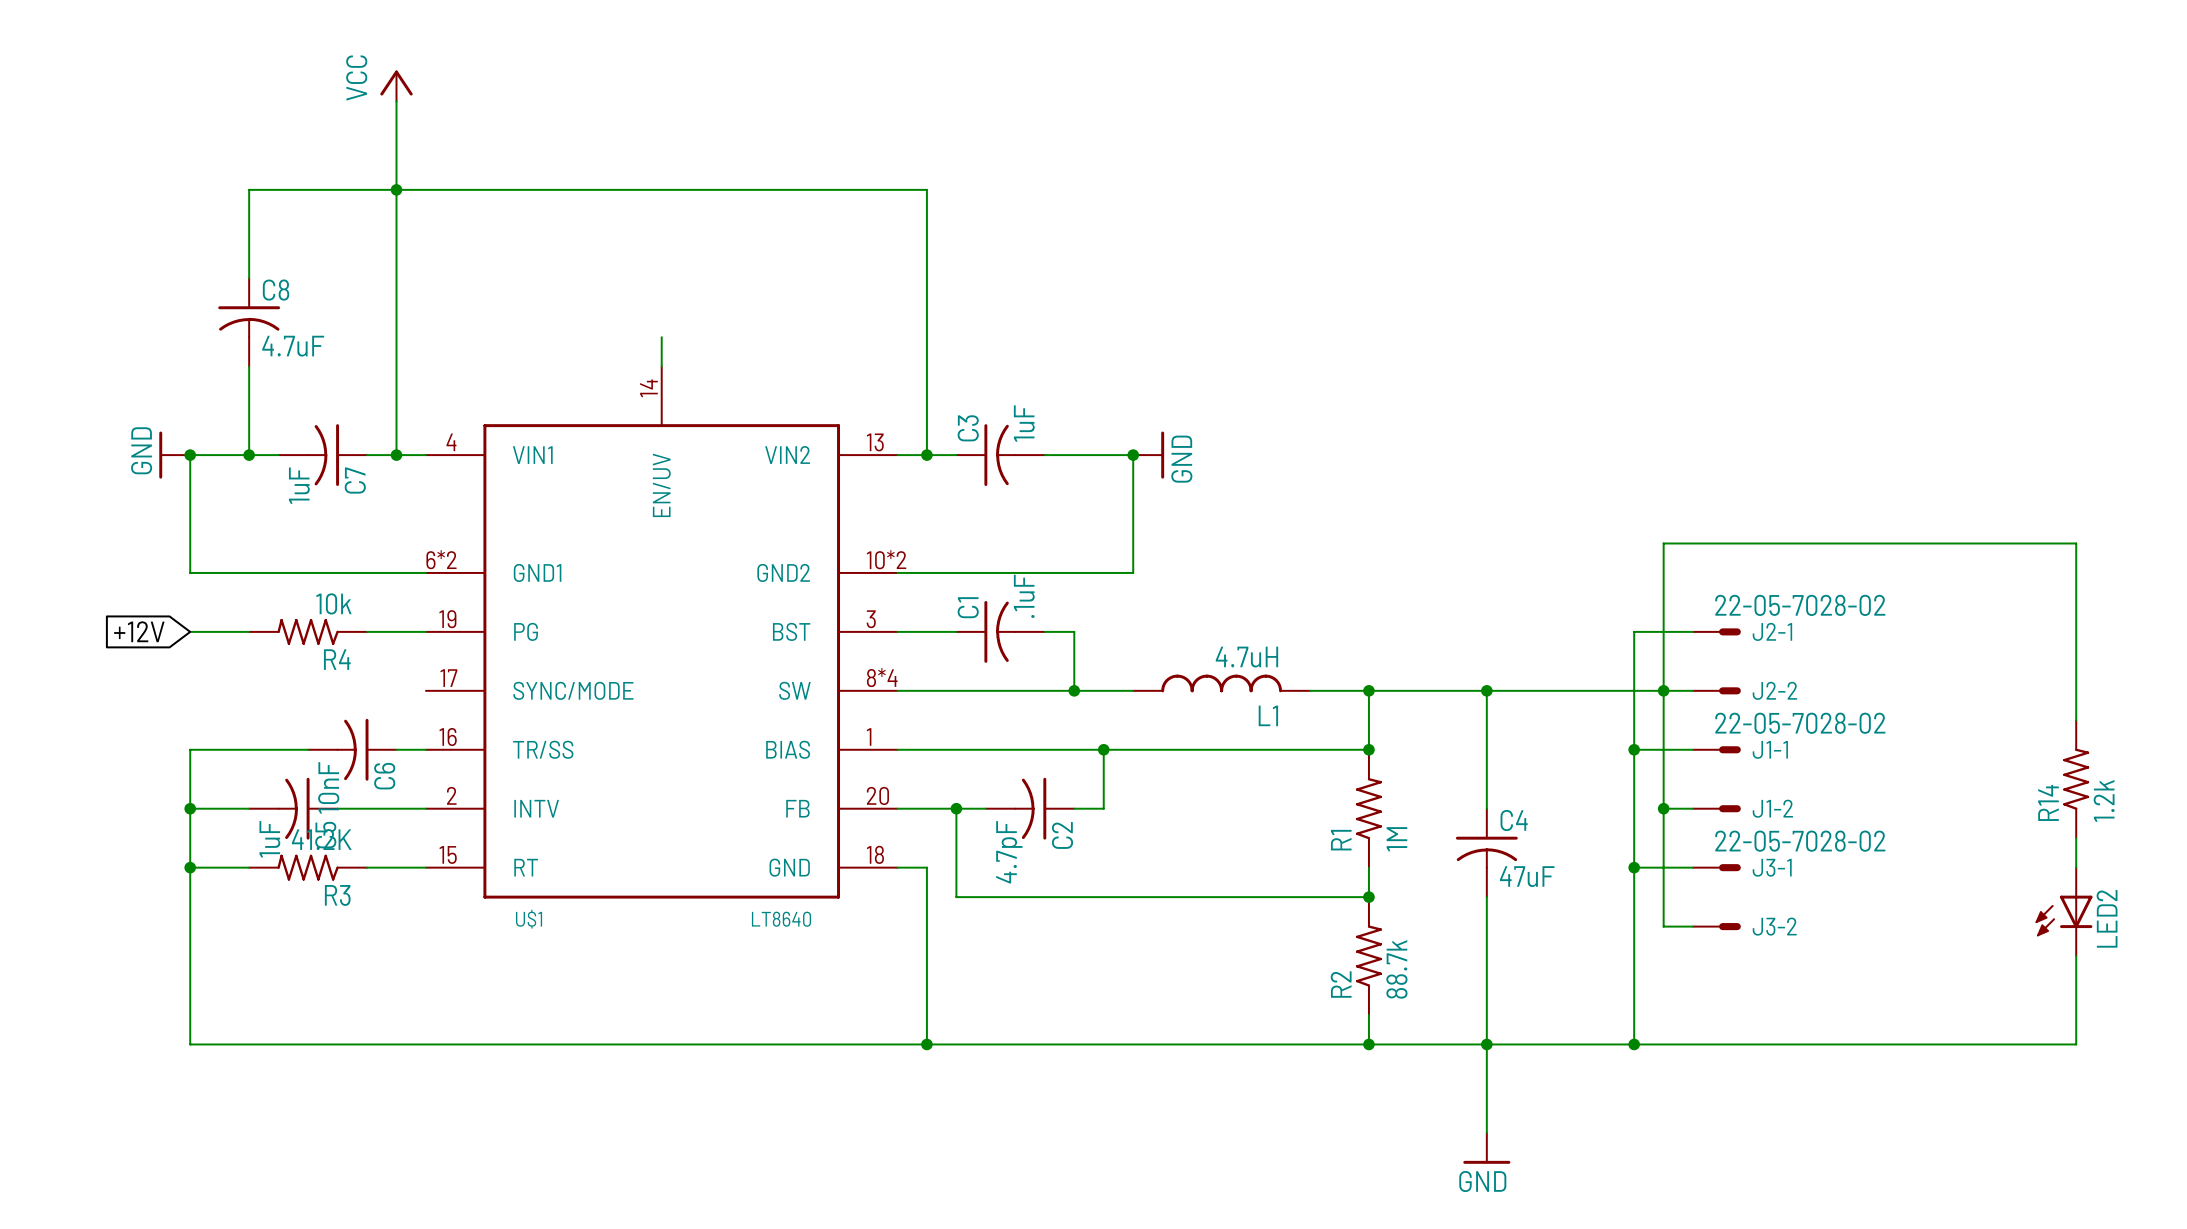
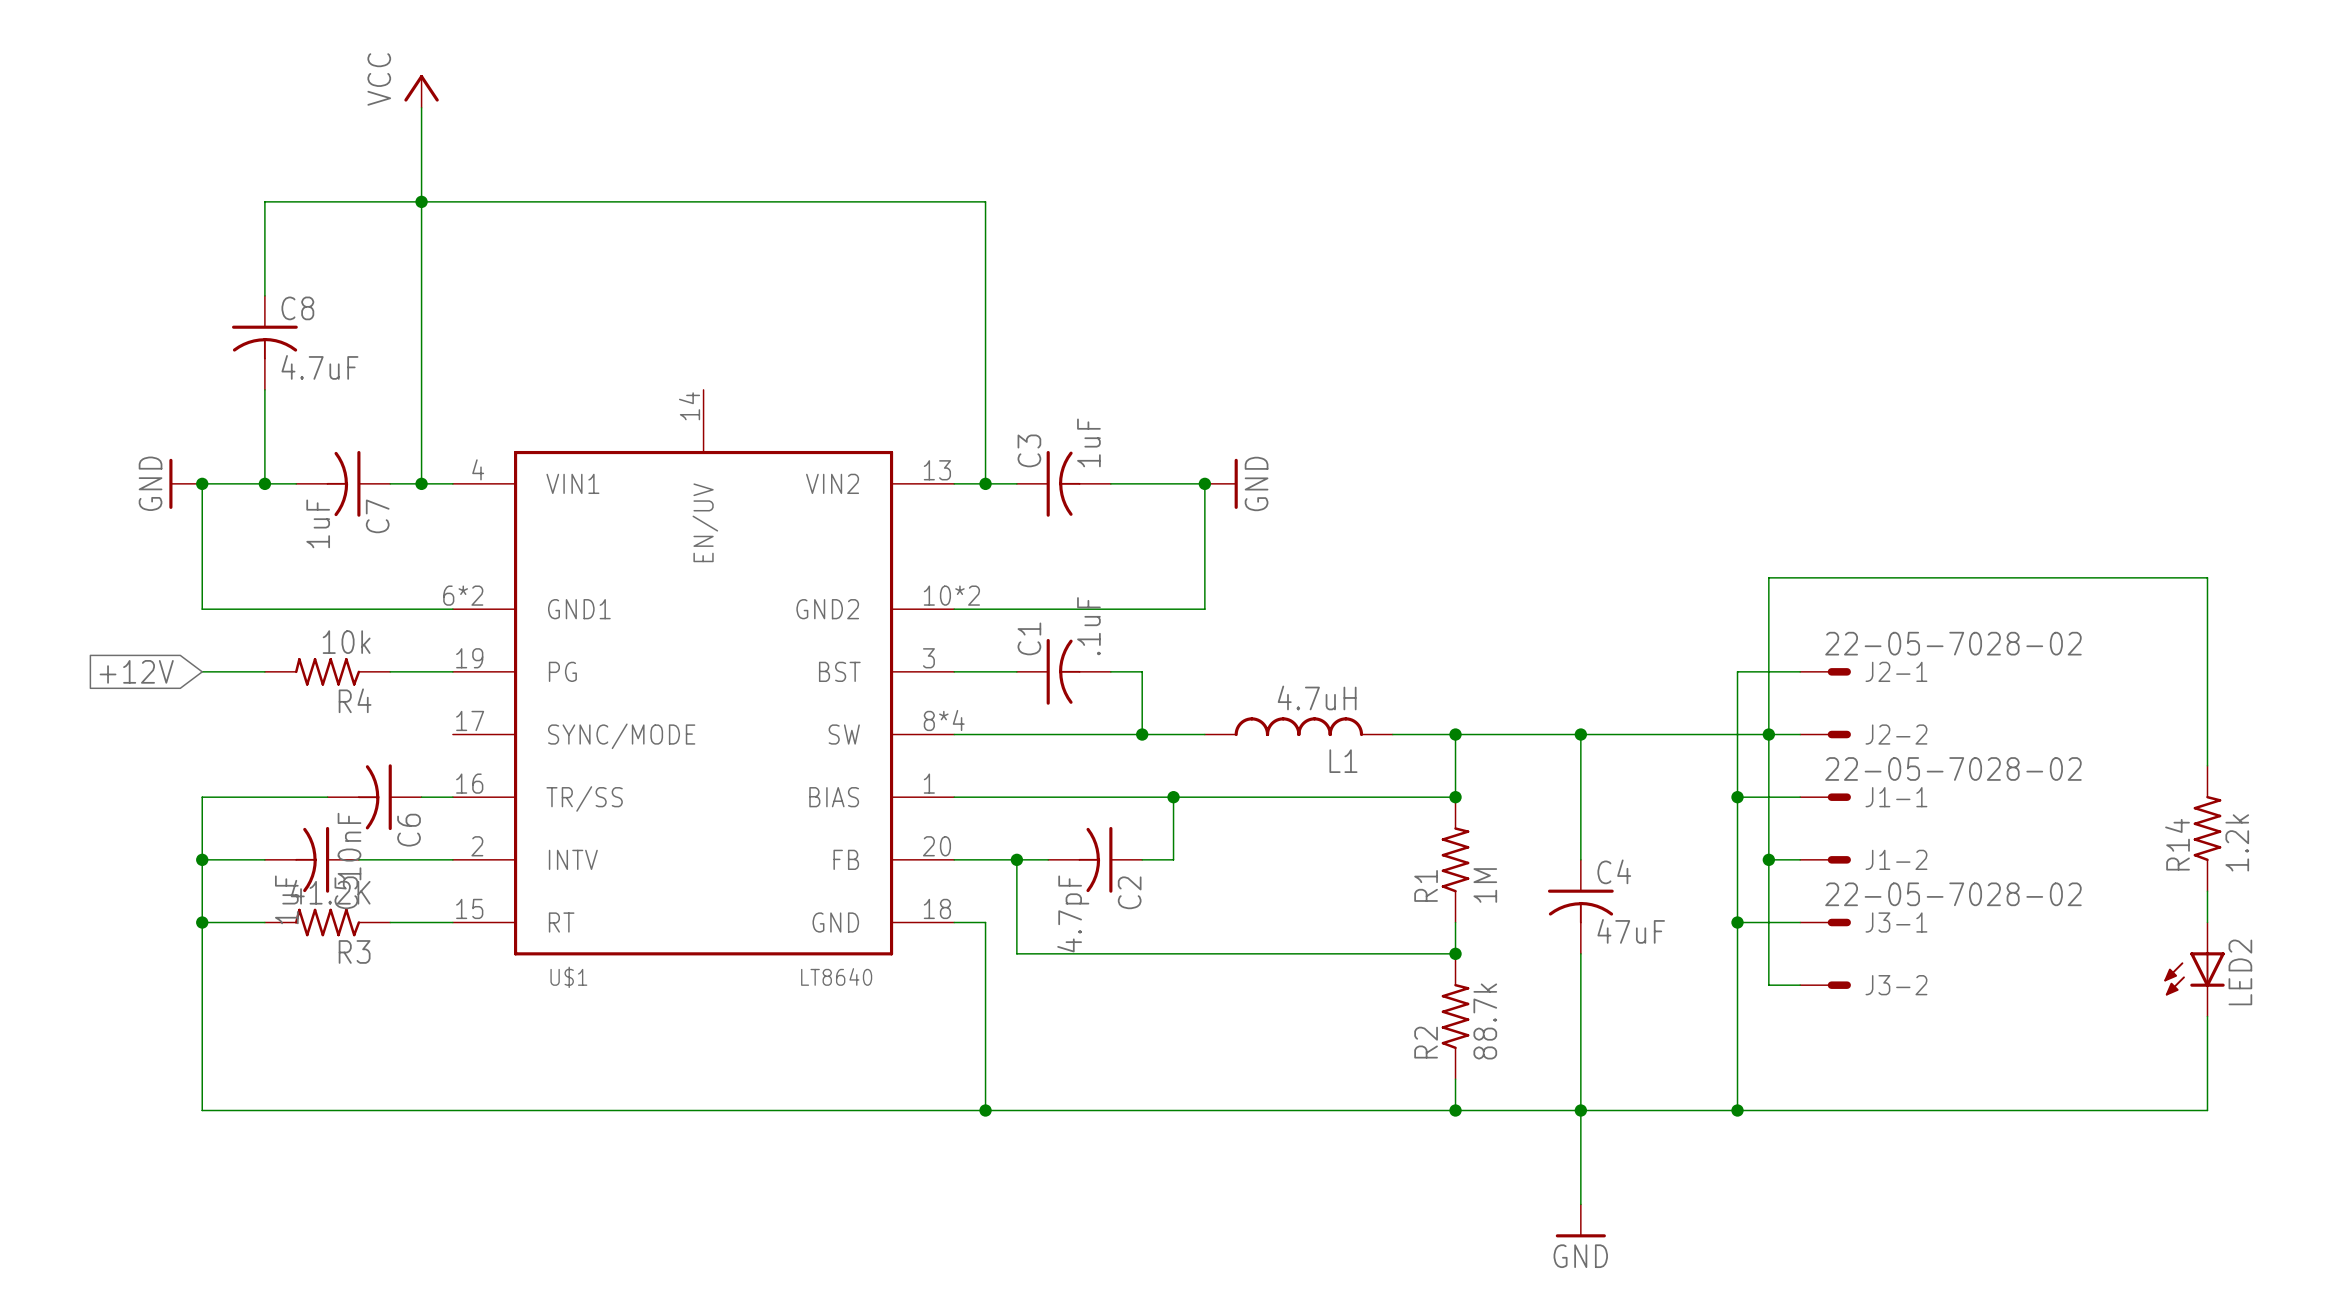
wire: (661, 337) (661, 366) -> none

